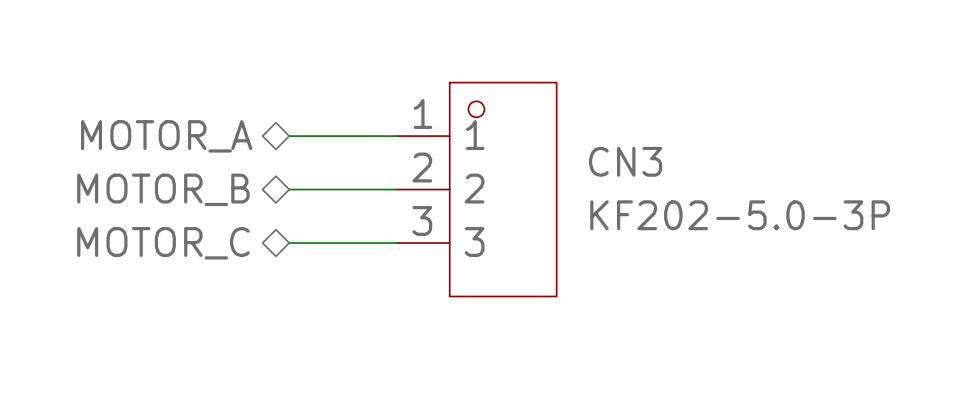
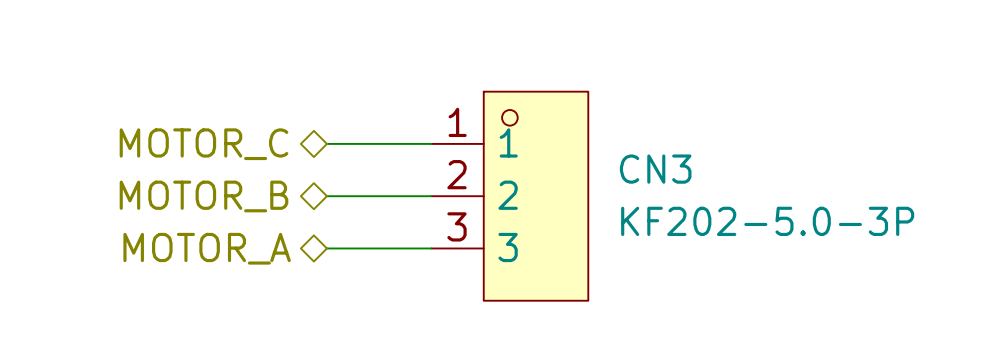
hierarchical label: MOTOR_A (166, 136) -> MOTOR_C (203, 144)
hierarchical label: MOTOR_C (163, 243) -> MOTOR_A (207, 248)

